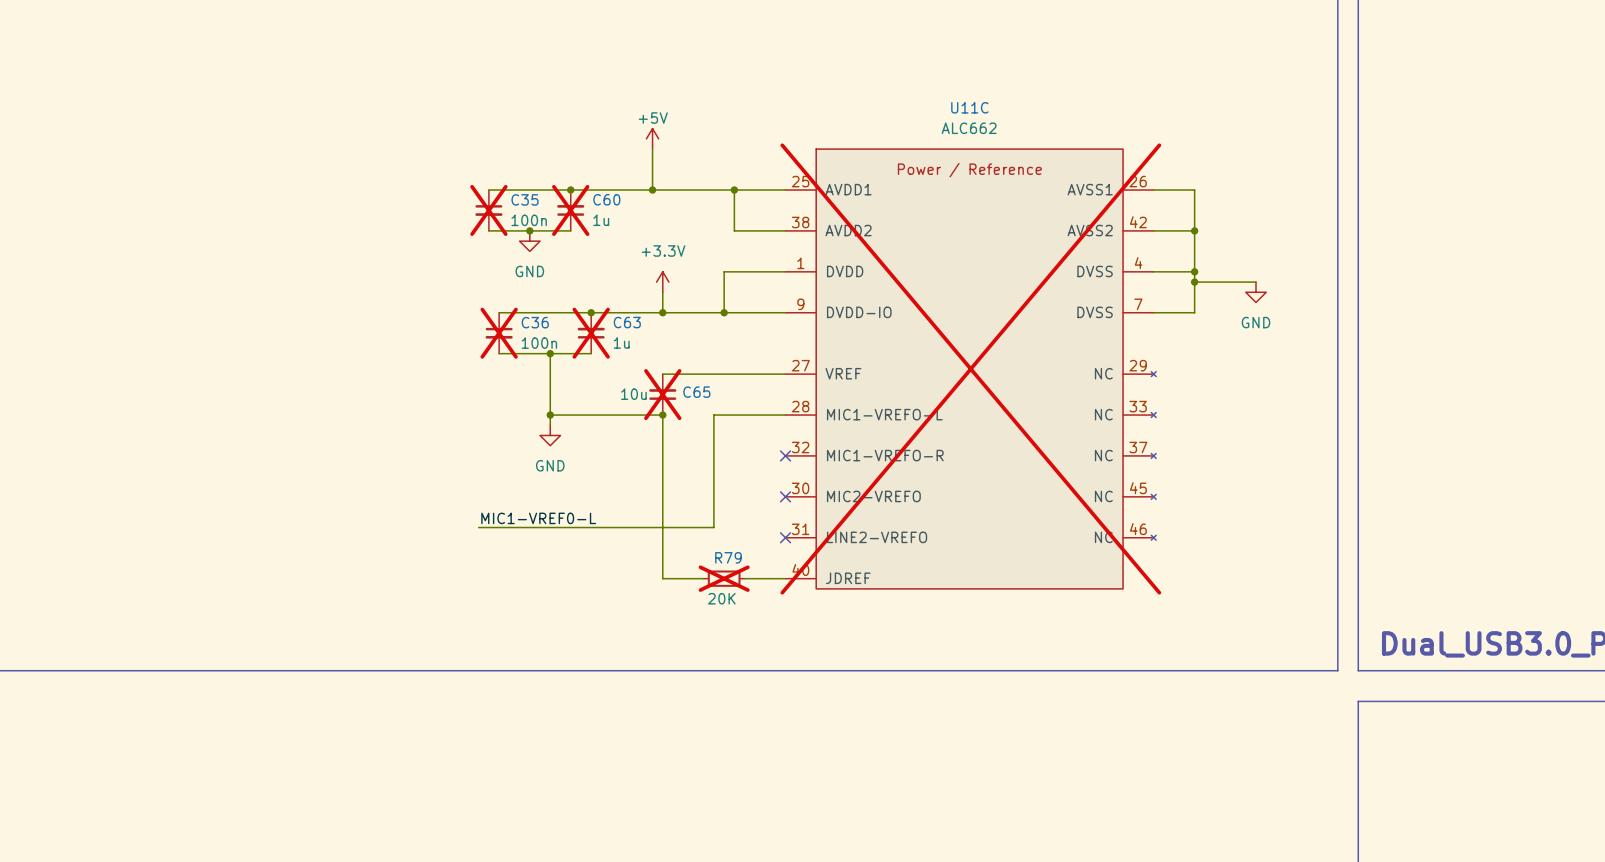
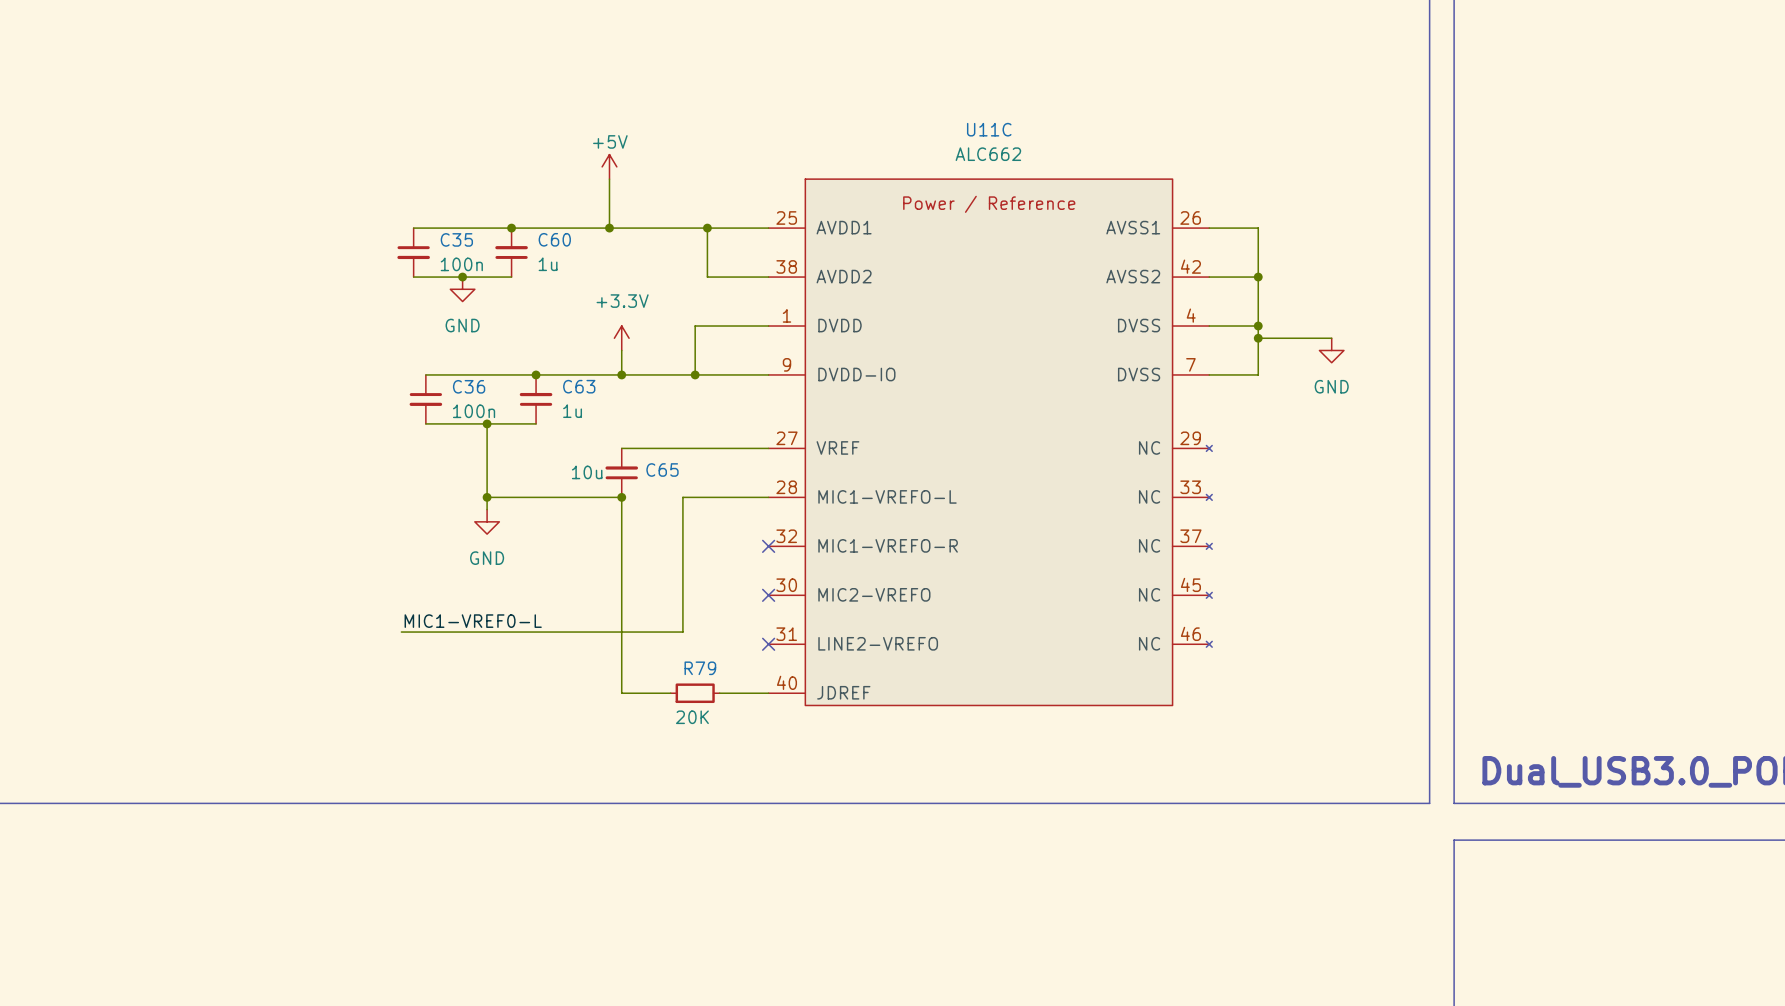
C35 do-not-place cross: (488, 210) -> none
C60 do-not-place cross: (570, 210) -> none
C36 do-not-place cross: (499, 333) -> none
C63 do-not-place cross: (591, 333) -> none
U11C do-not-place cross: (970, 369) -> none
C65 do-not-place cross: (662, 394) -> none
R79 do-not-place cross: (724, 578) -> none

